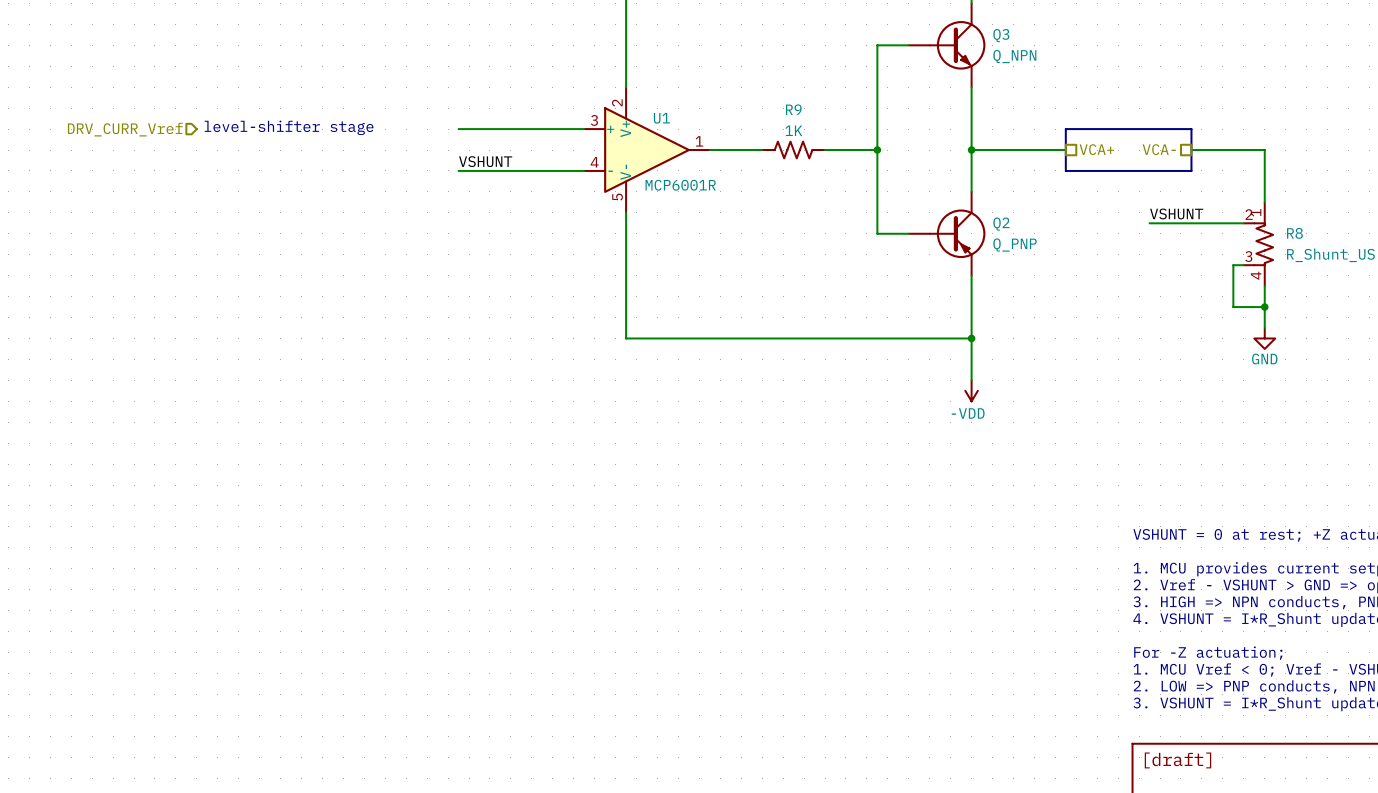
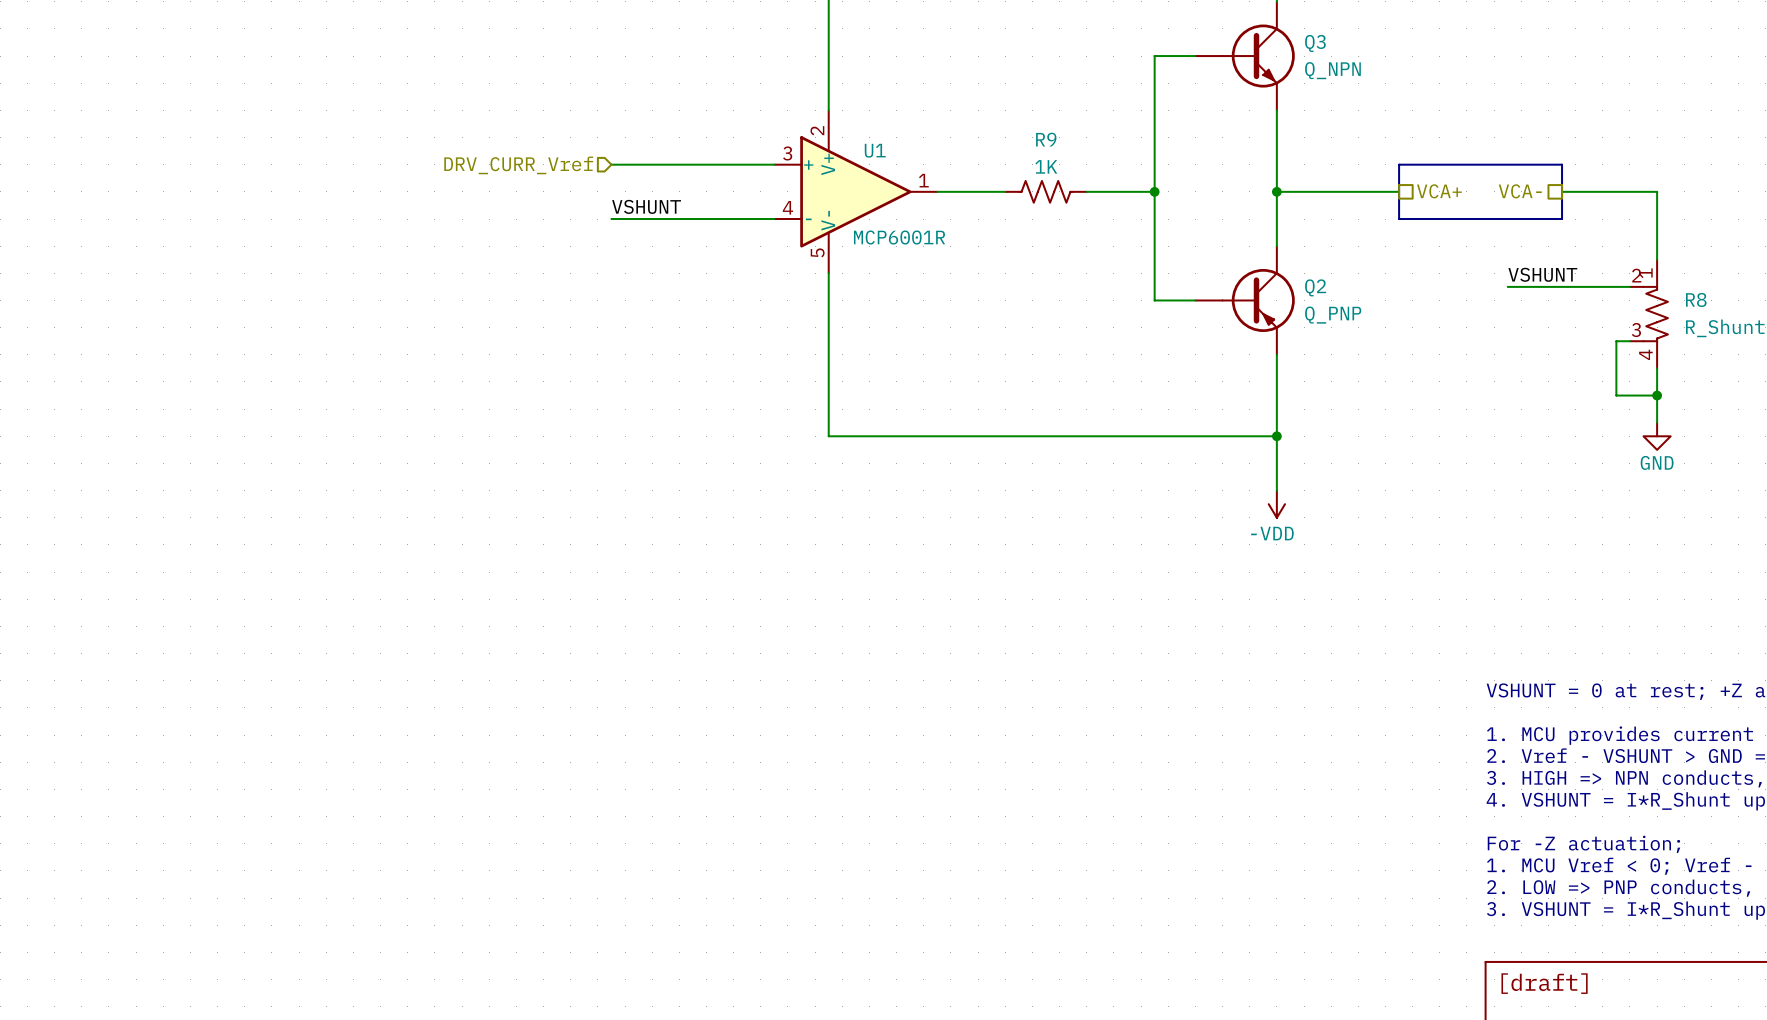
text: level-shifter stage (289, 127) -> none
hierarchical label: DRV_CURR_Vref (125, 129) -> none
hierarchical label: none -> DRV_CURR_Vref (518, 165)

